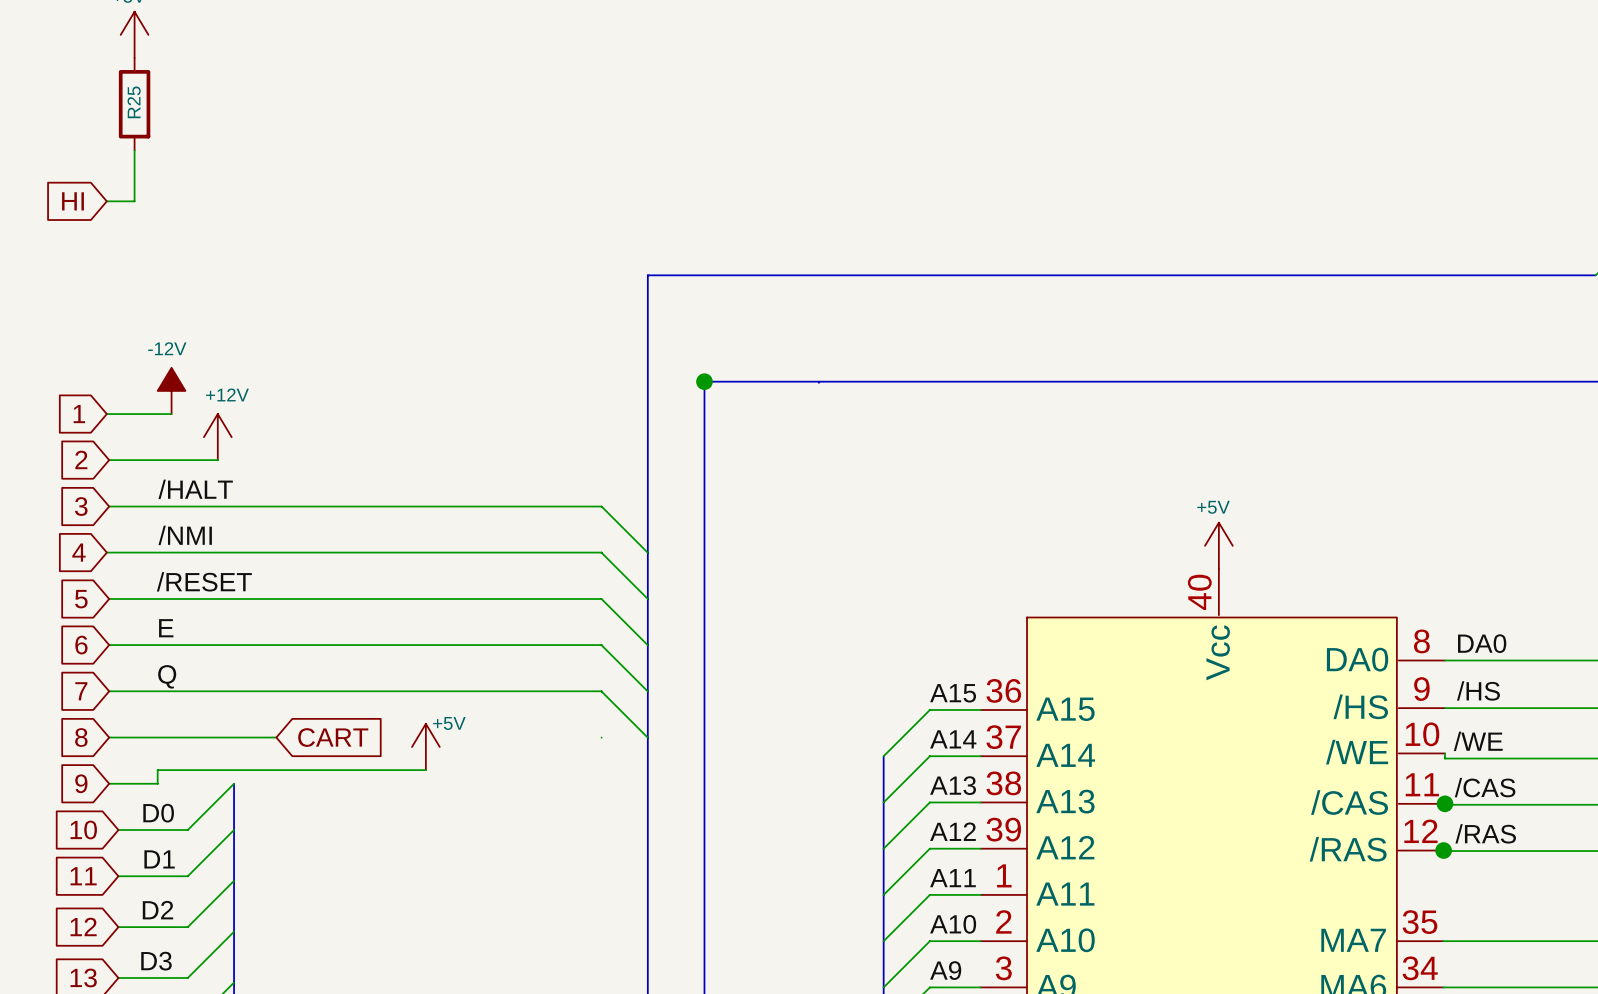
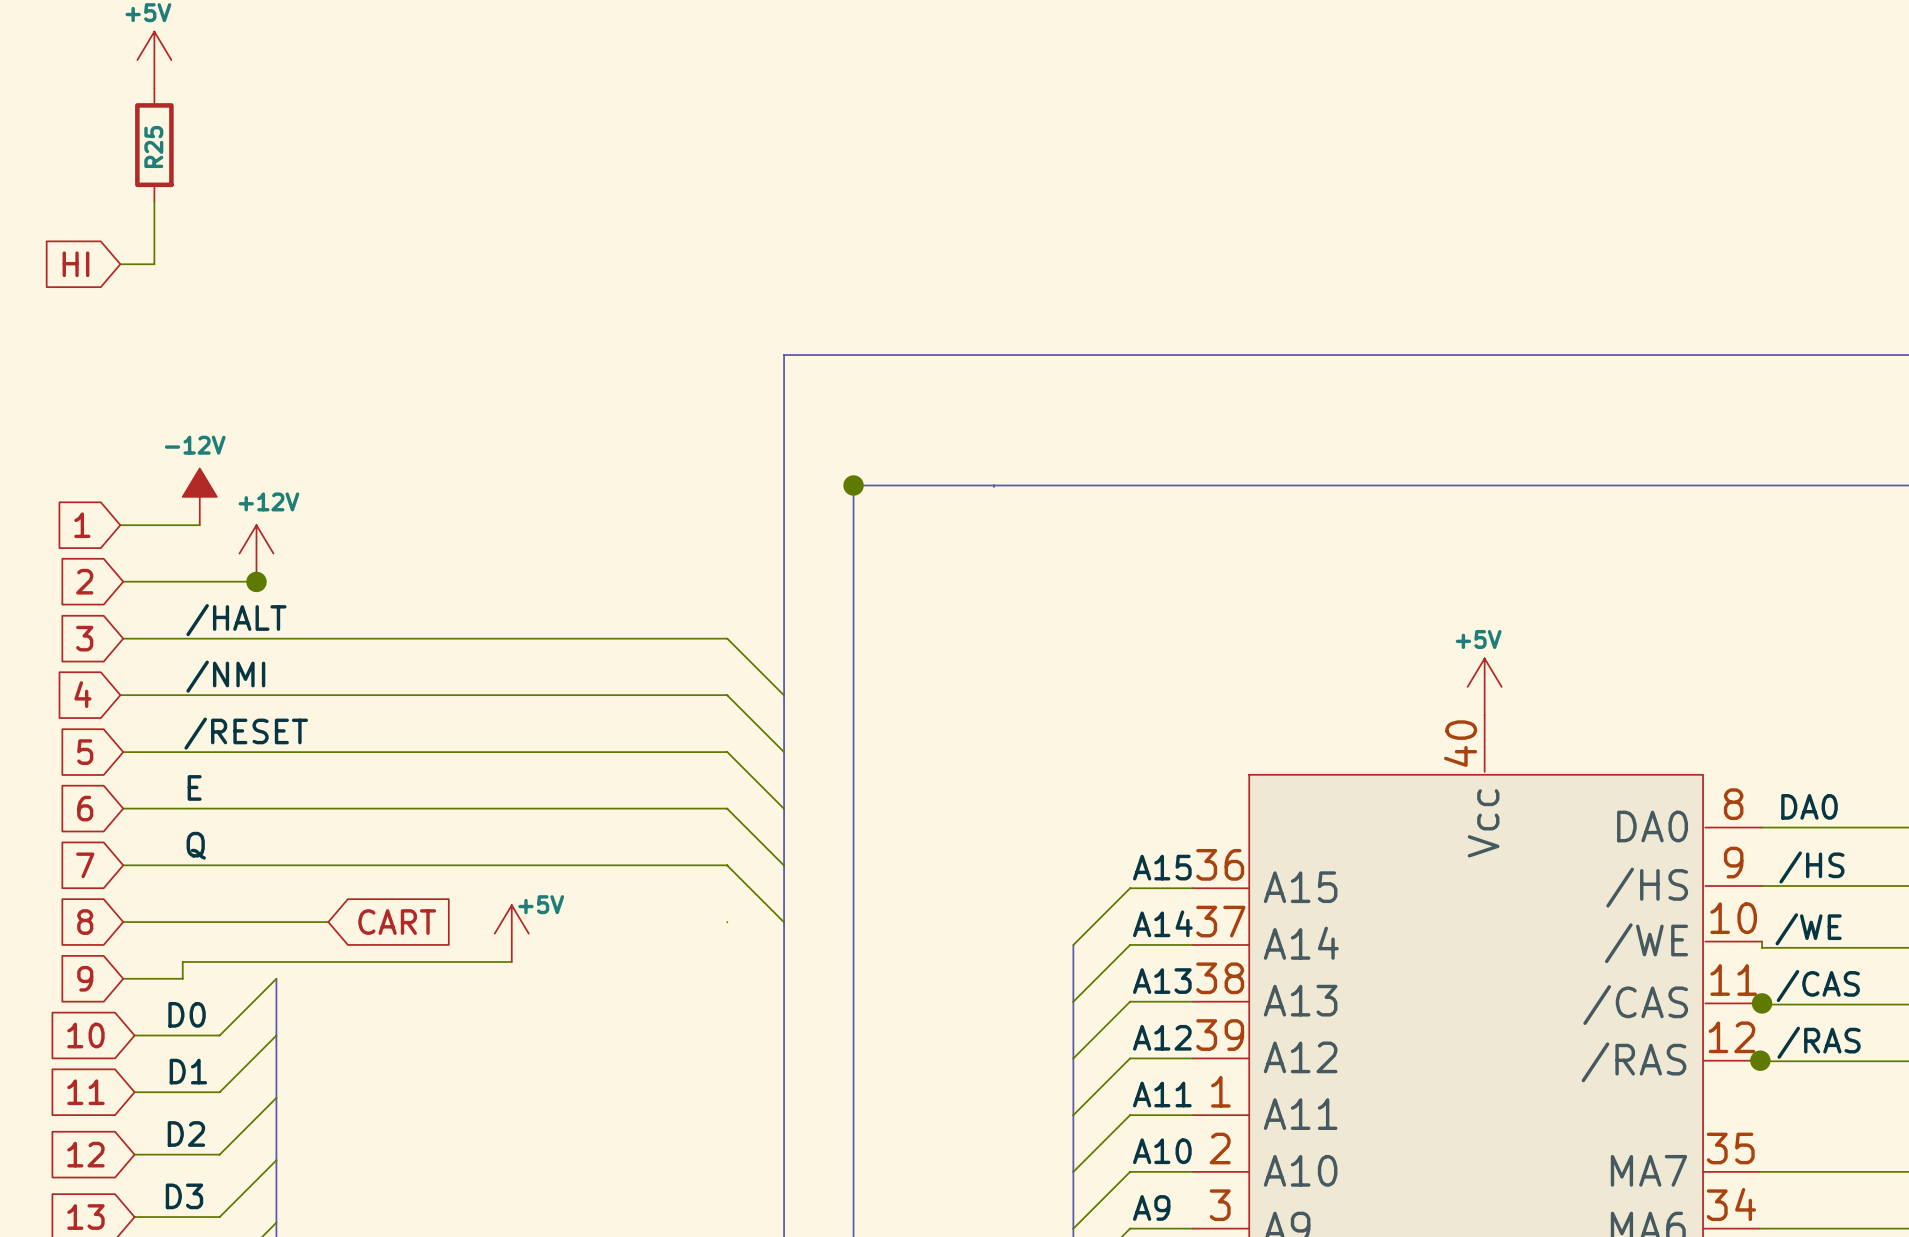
junction: none -> (256, 581)

